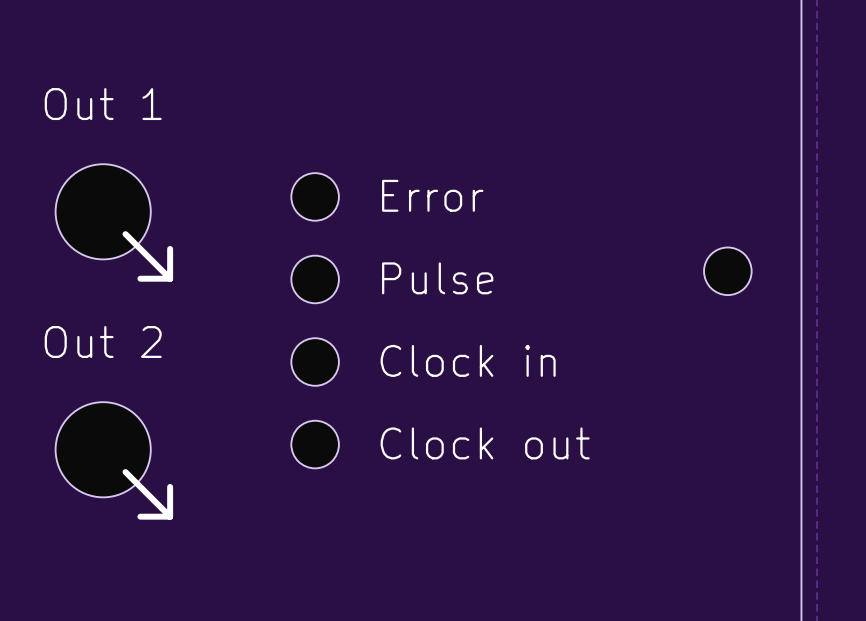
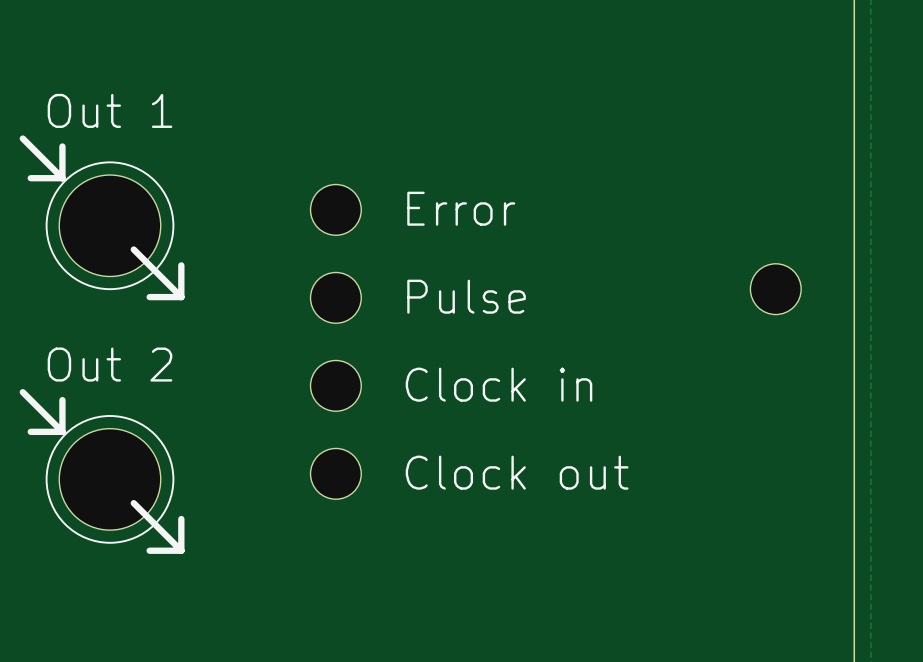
part: none -> Out 1 (102, 217)
part: Out 1 (114, 222) -> none
part: none -> Out 2 (102, 471)
part: Out 2 (114, 460) -> none

